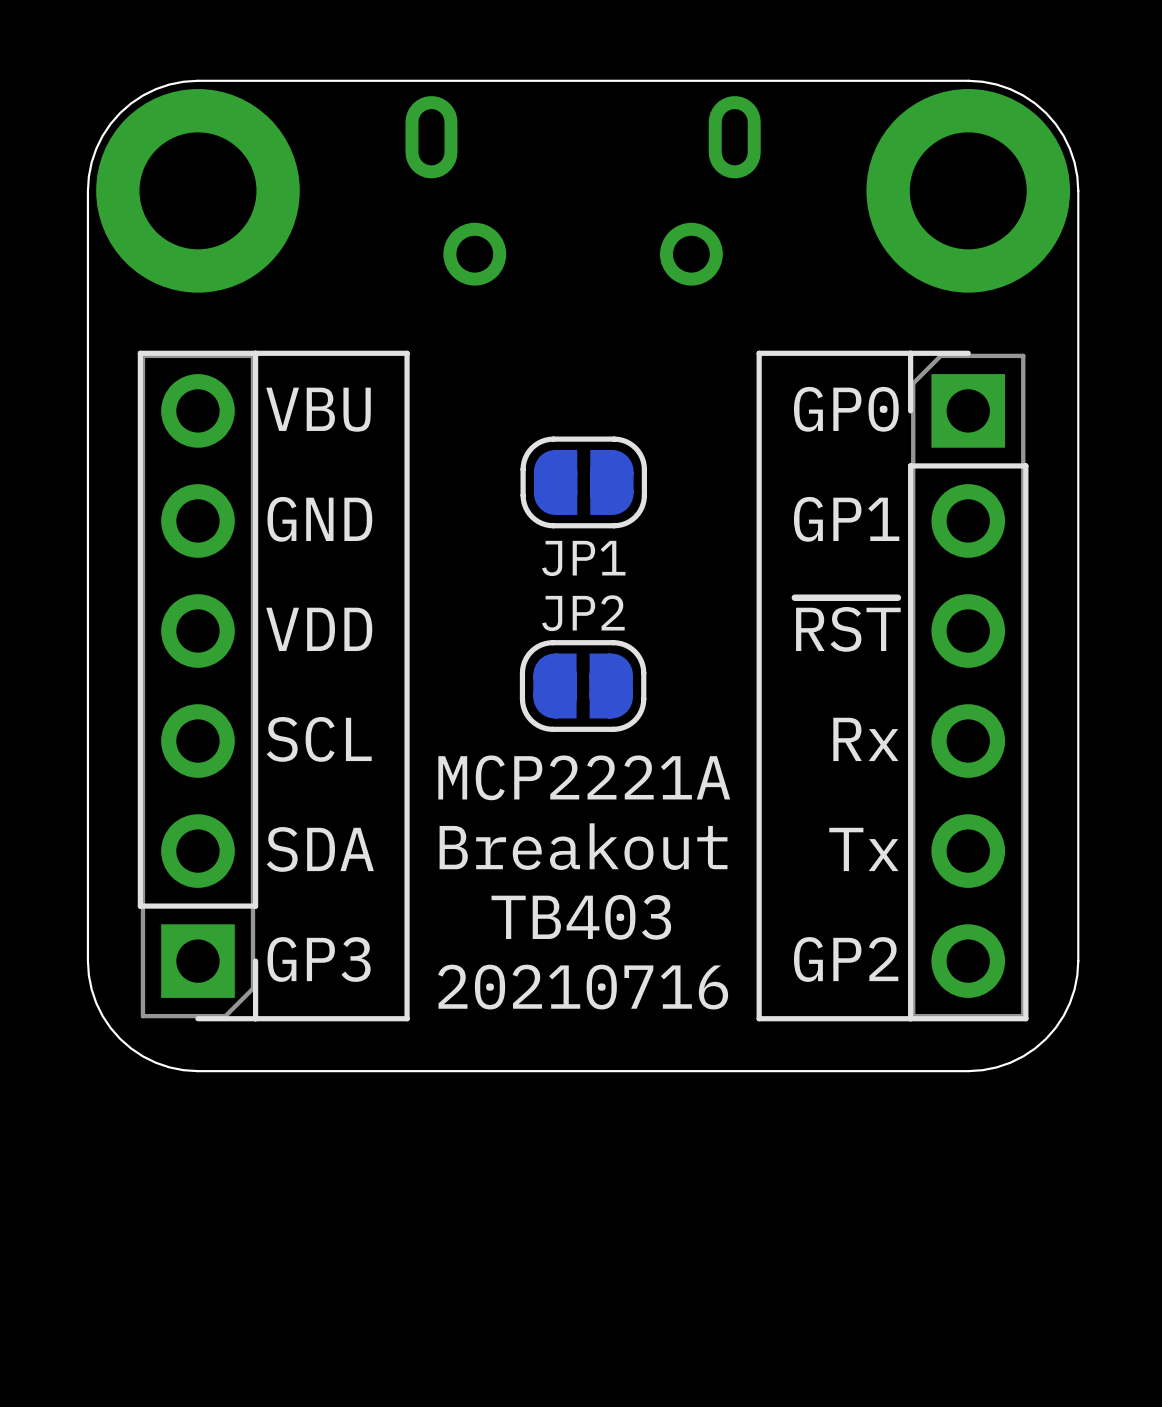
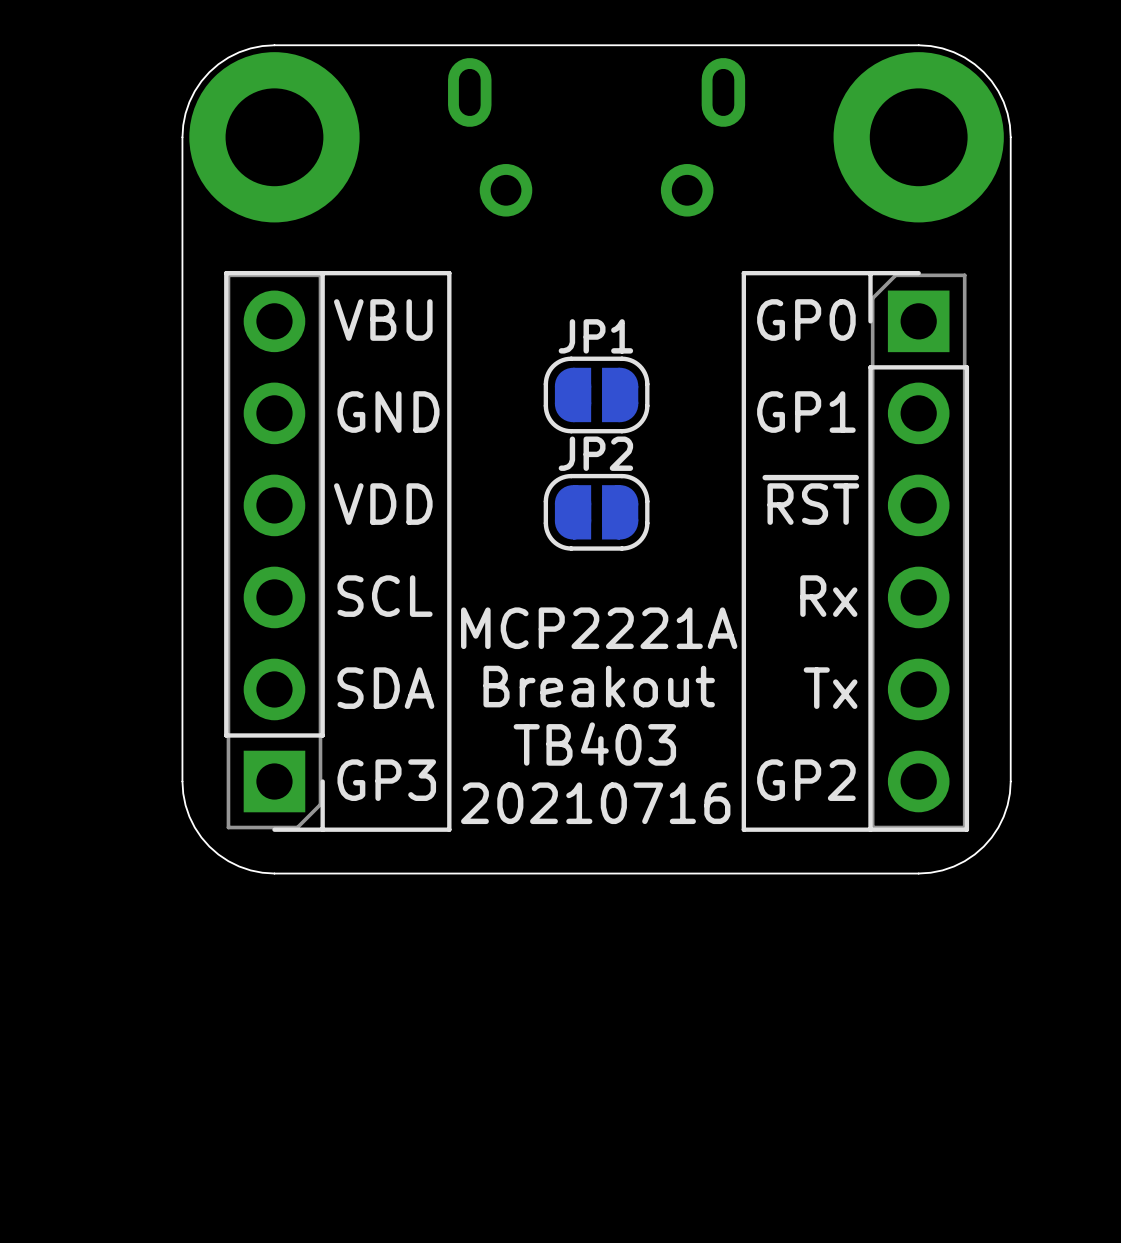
JP1 footprint: [520, 436, 648, 529] -> [543, 356, 650, 434]
JP1 name position: JP1 (583, 558) -> JP1 (595, 336)
JP2 footprint: [519, 640, 647, 732] -> [543, 473, 650, 551]

